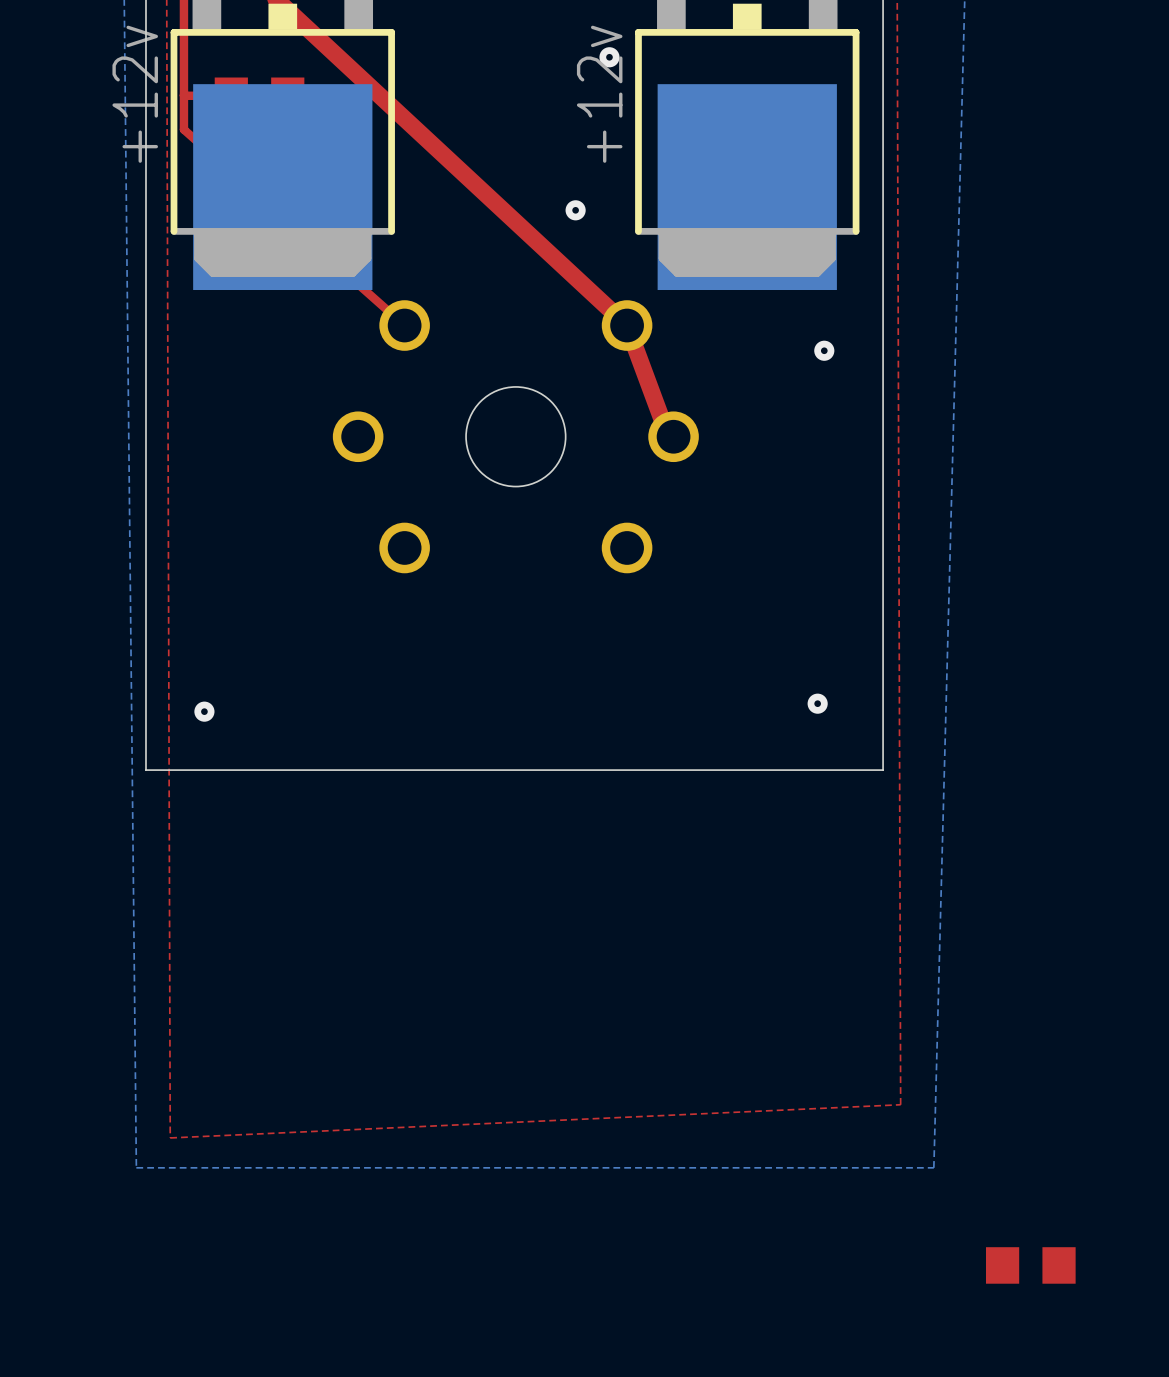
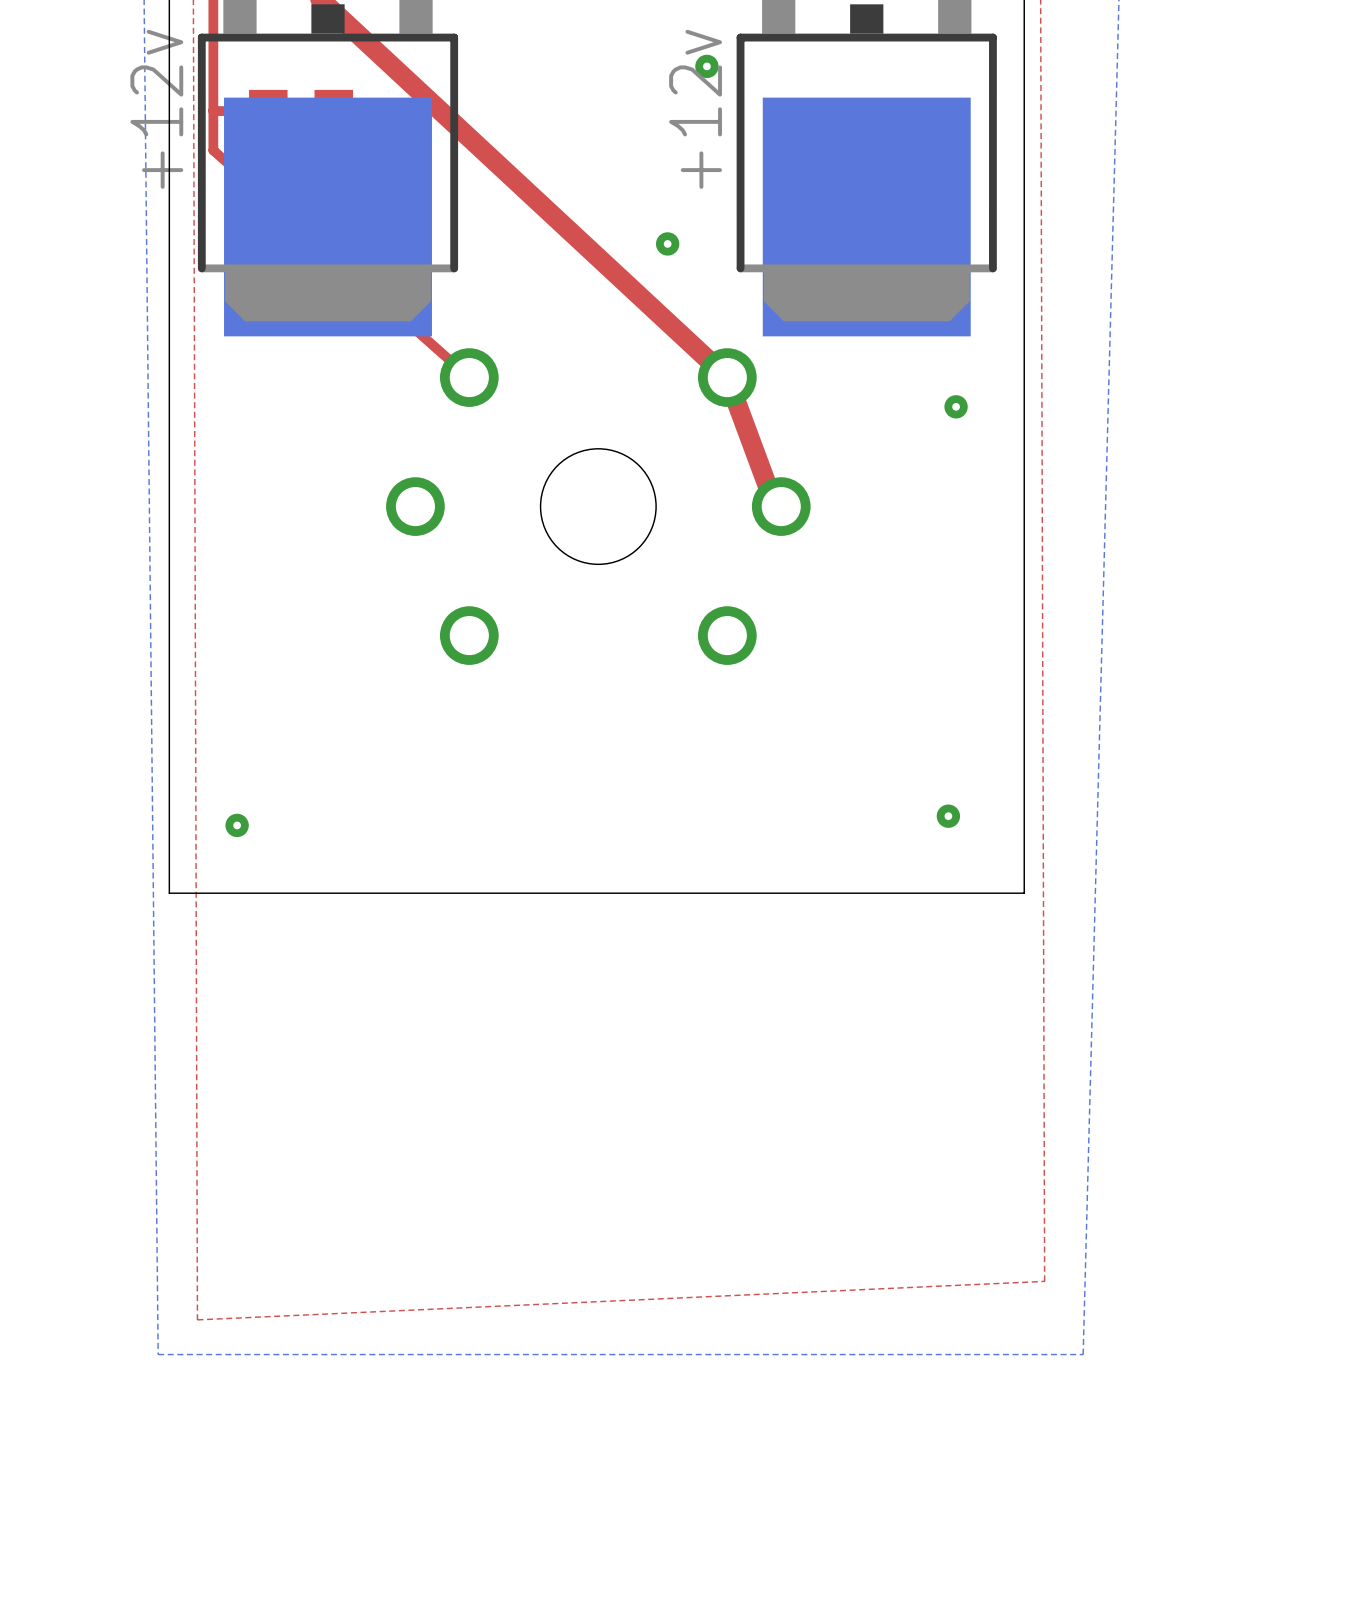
part: (1030, 1265) -> none

